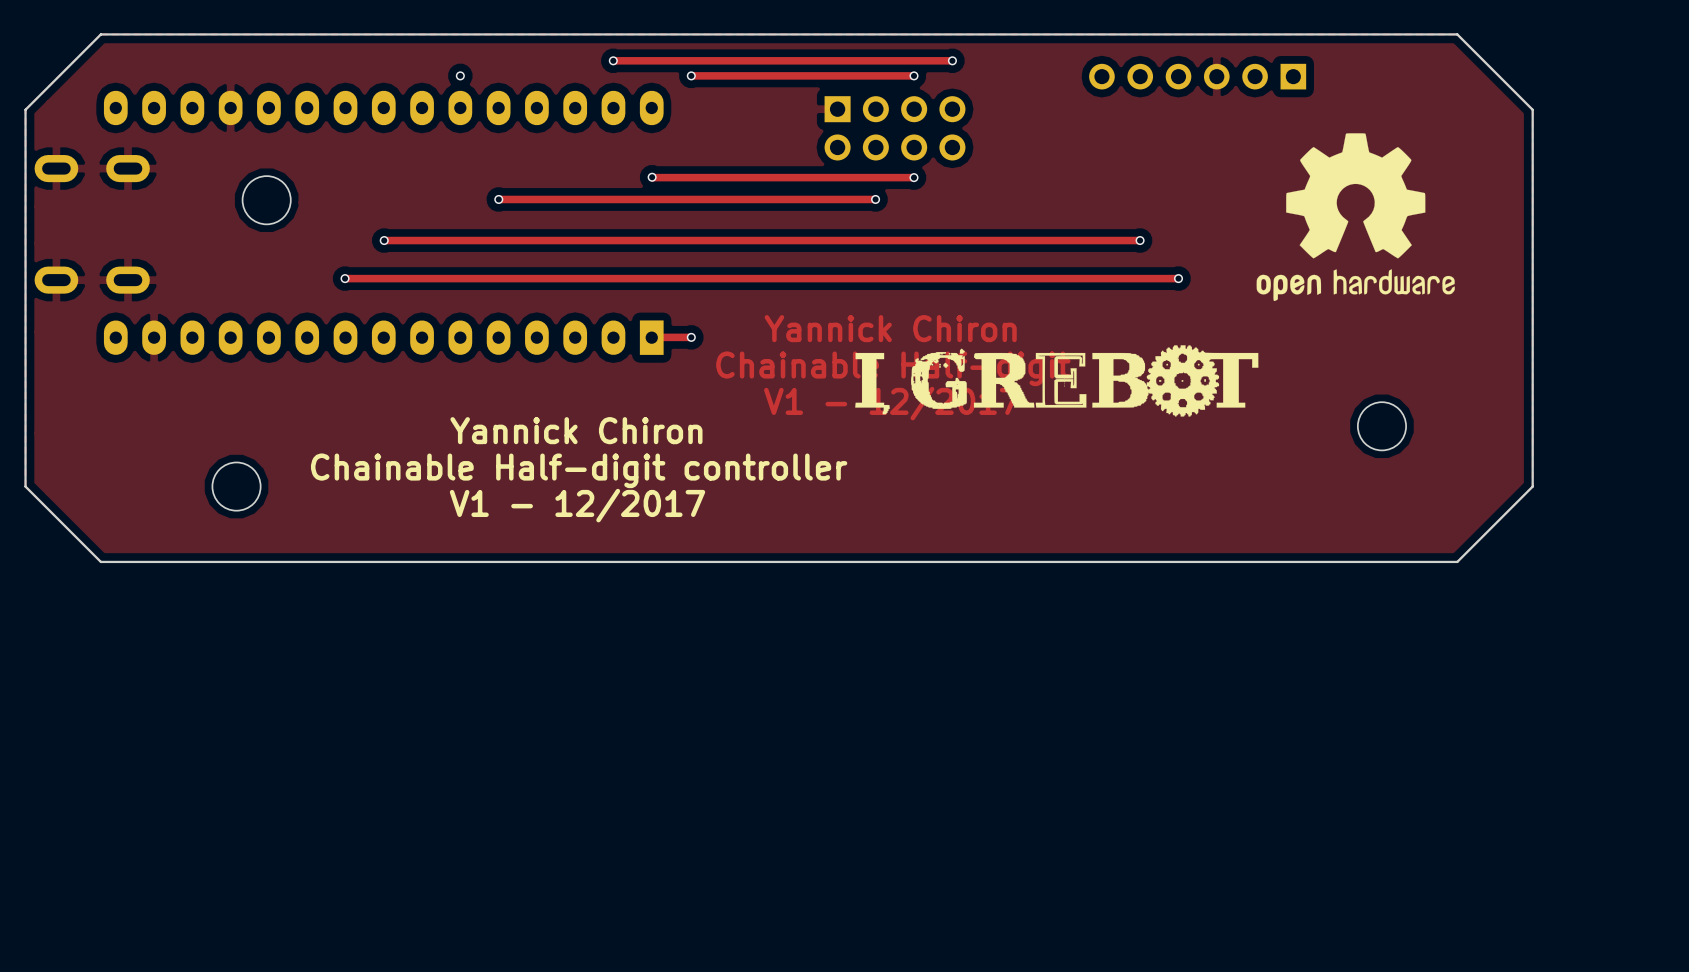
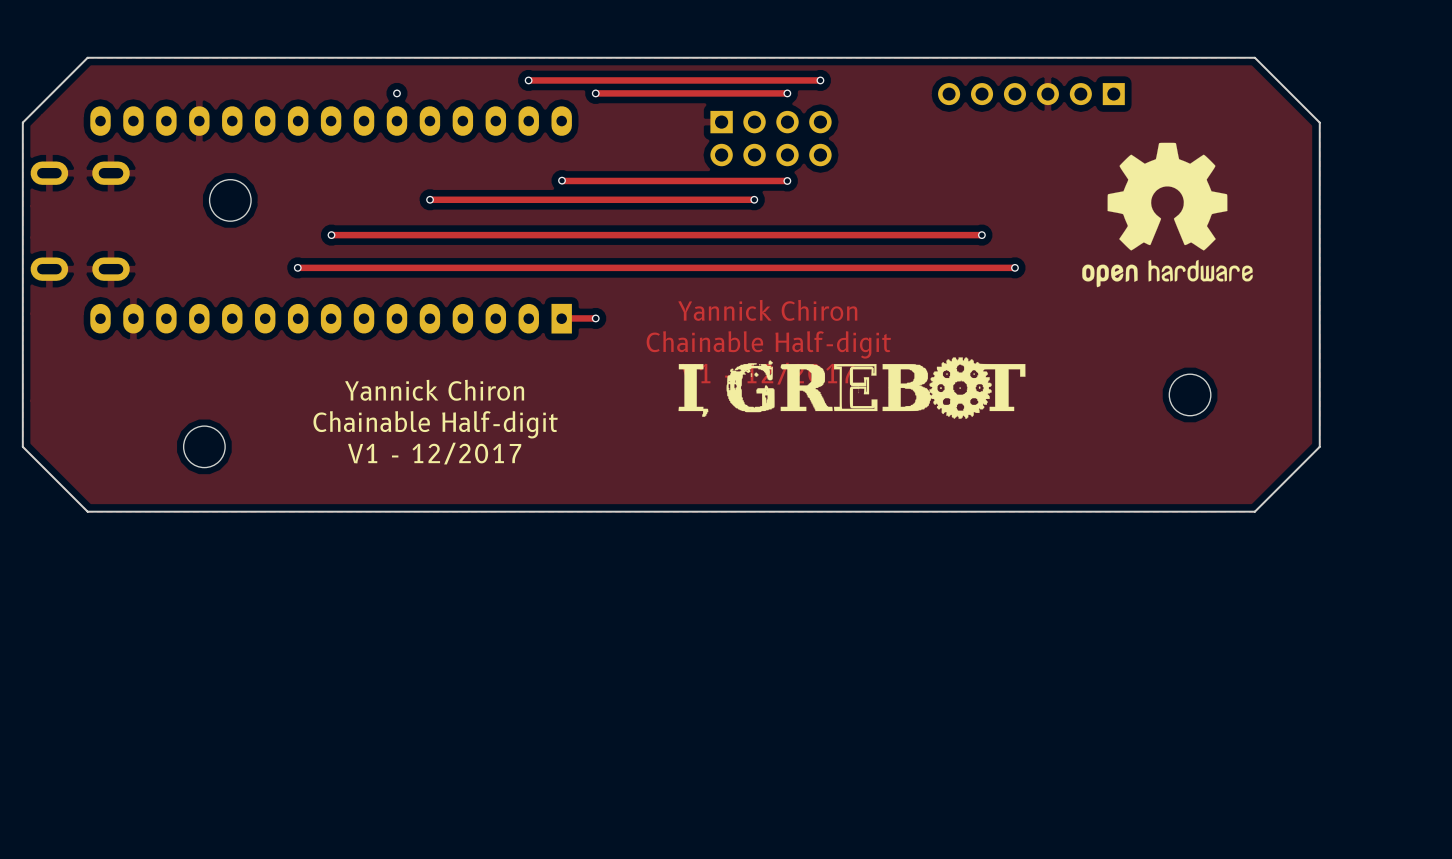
drawing position: (1056, 380) -> (852, 388)
text position: Yannick Chiron (576, 430) -> Yannick Chiron (434, 390)
text: Chainable Half-digit controller (579, 470) -> Chainable Half-digit (435, 424)
text position: V1 - 12/2017 (577, 505) -> V1 - 12/2017 (434, 453)

